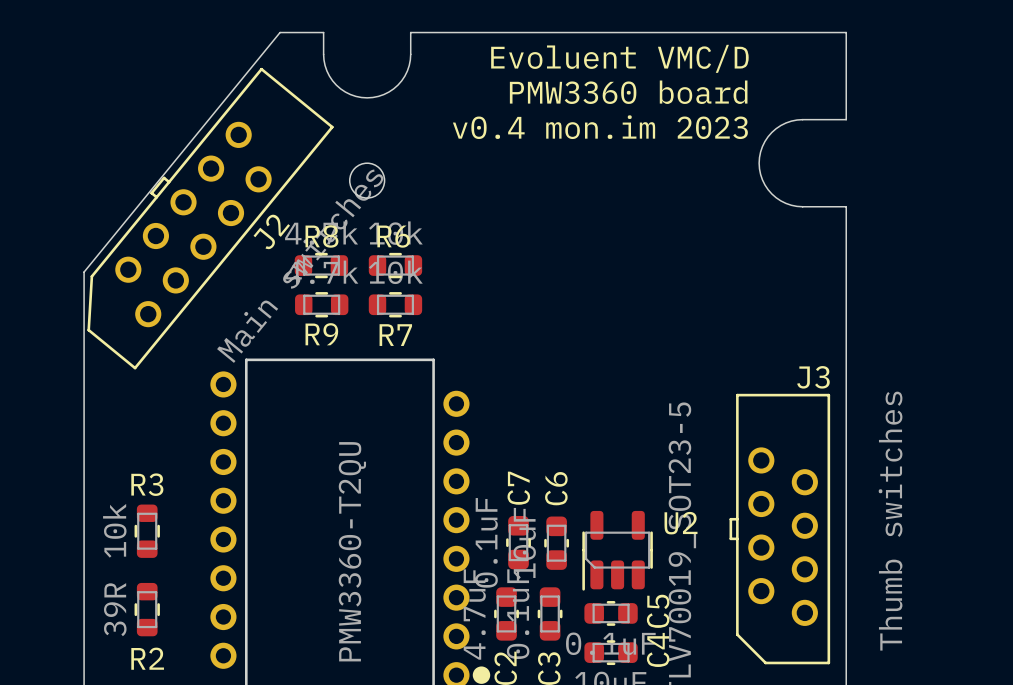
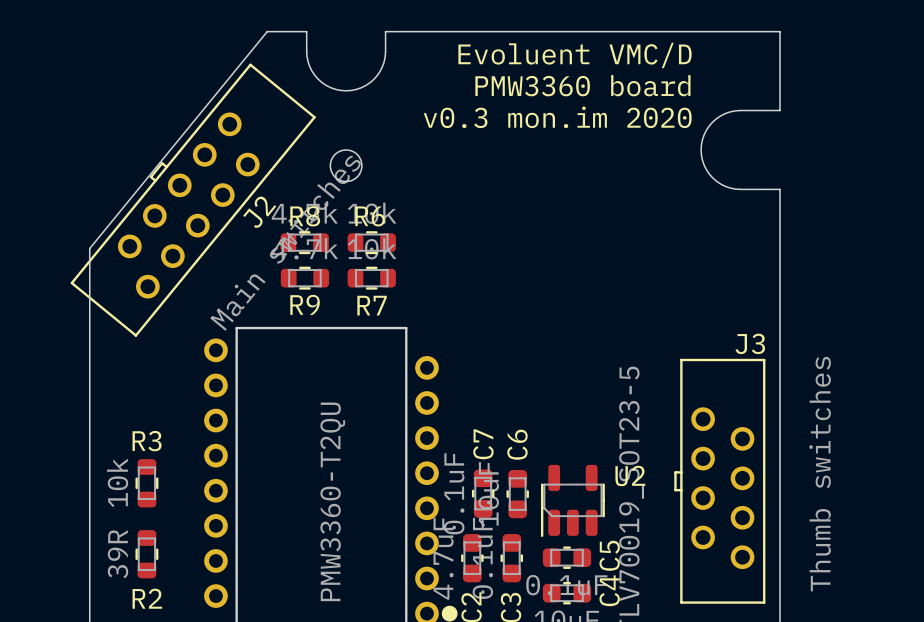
J2 footprint: [87, 67, 334, 370] -> [70, 63, 316, 337]
text: v0.4 mon.im 2023 (600, 127) -> v0.3 mon.im 2020 (557, 117)
J3 footprint: [729, 393, 831, 665] -> [674, 358, 766, 604]

